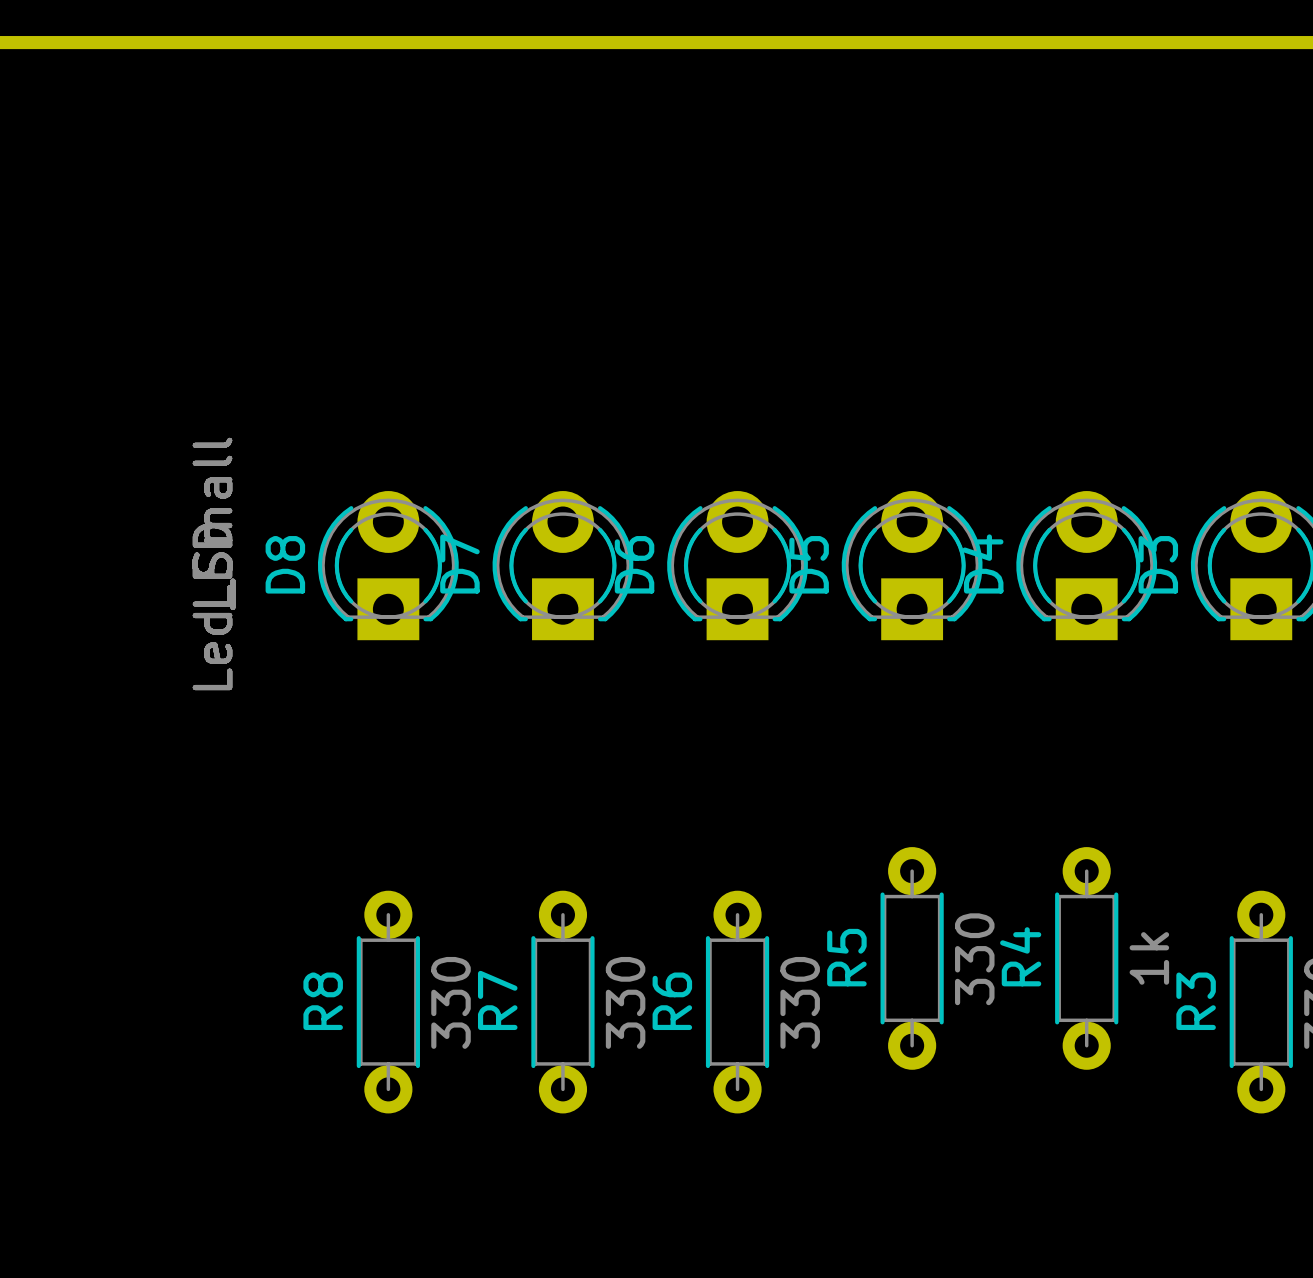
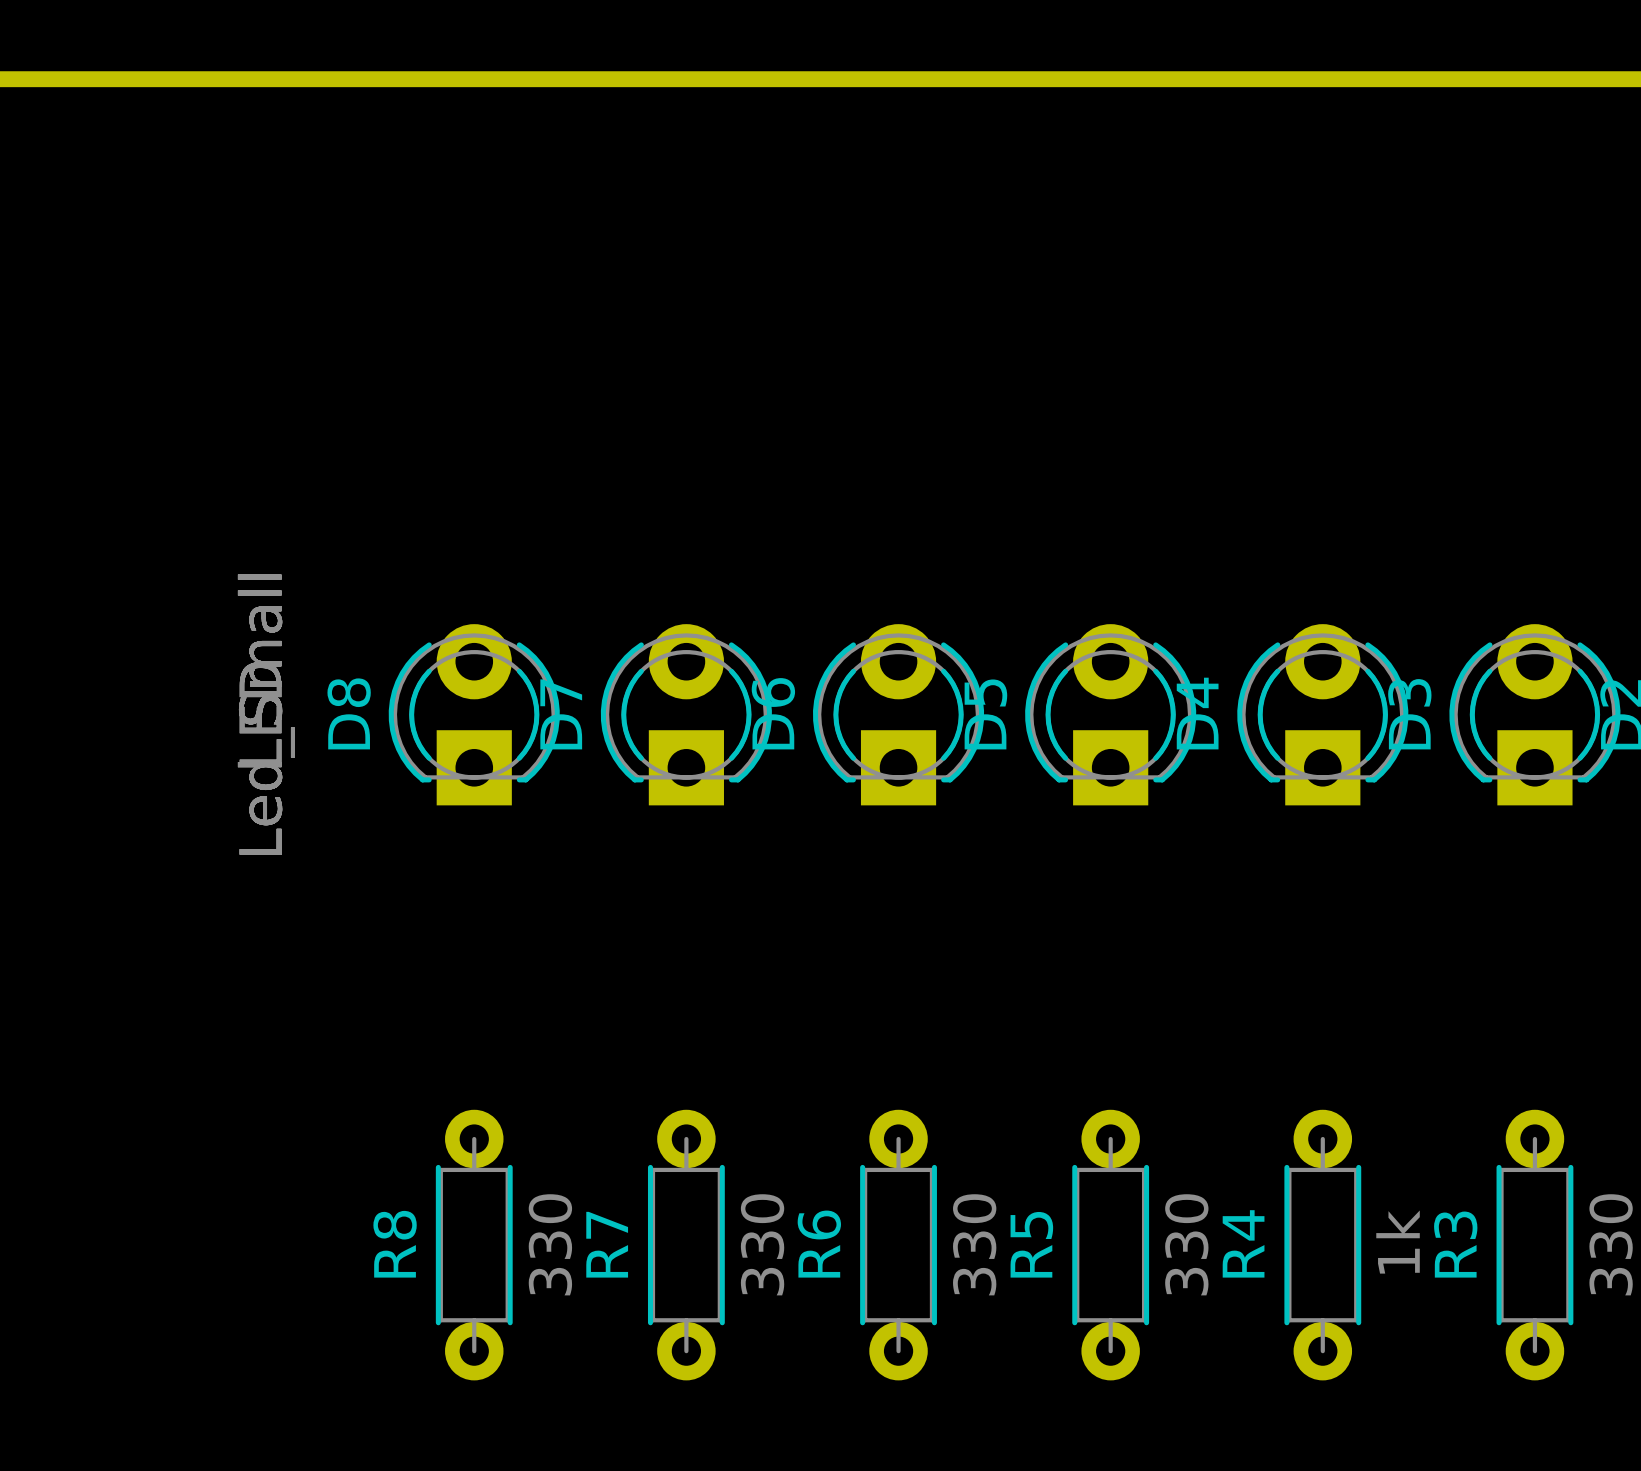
R5 position: (912, 958) -> (1110, 1245)
R4 position: (1086, 958) -> (1322, 1245)

